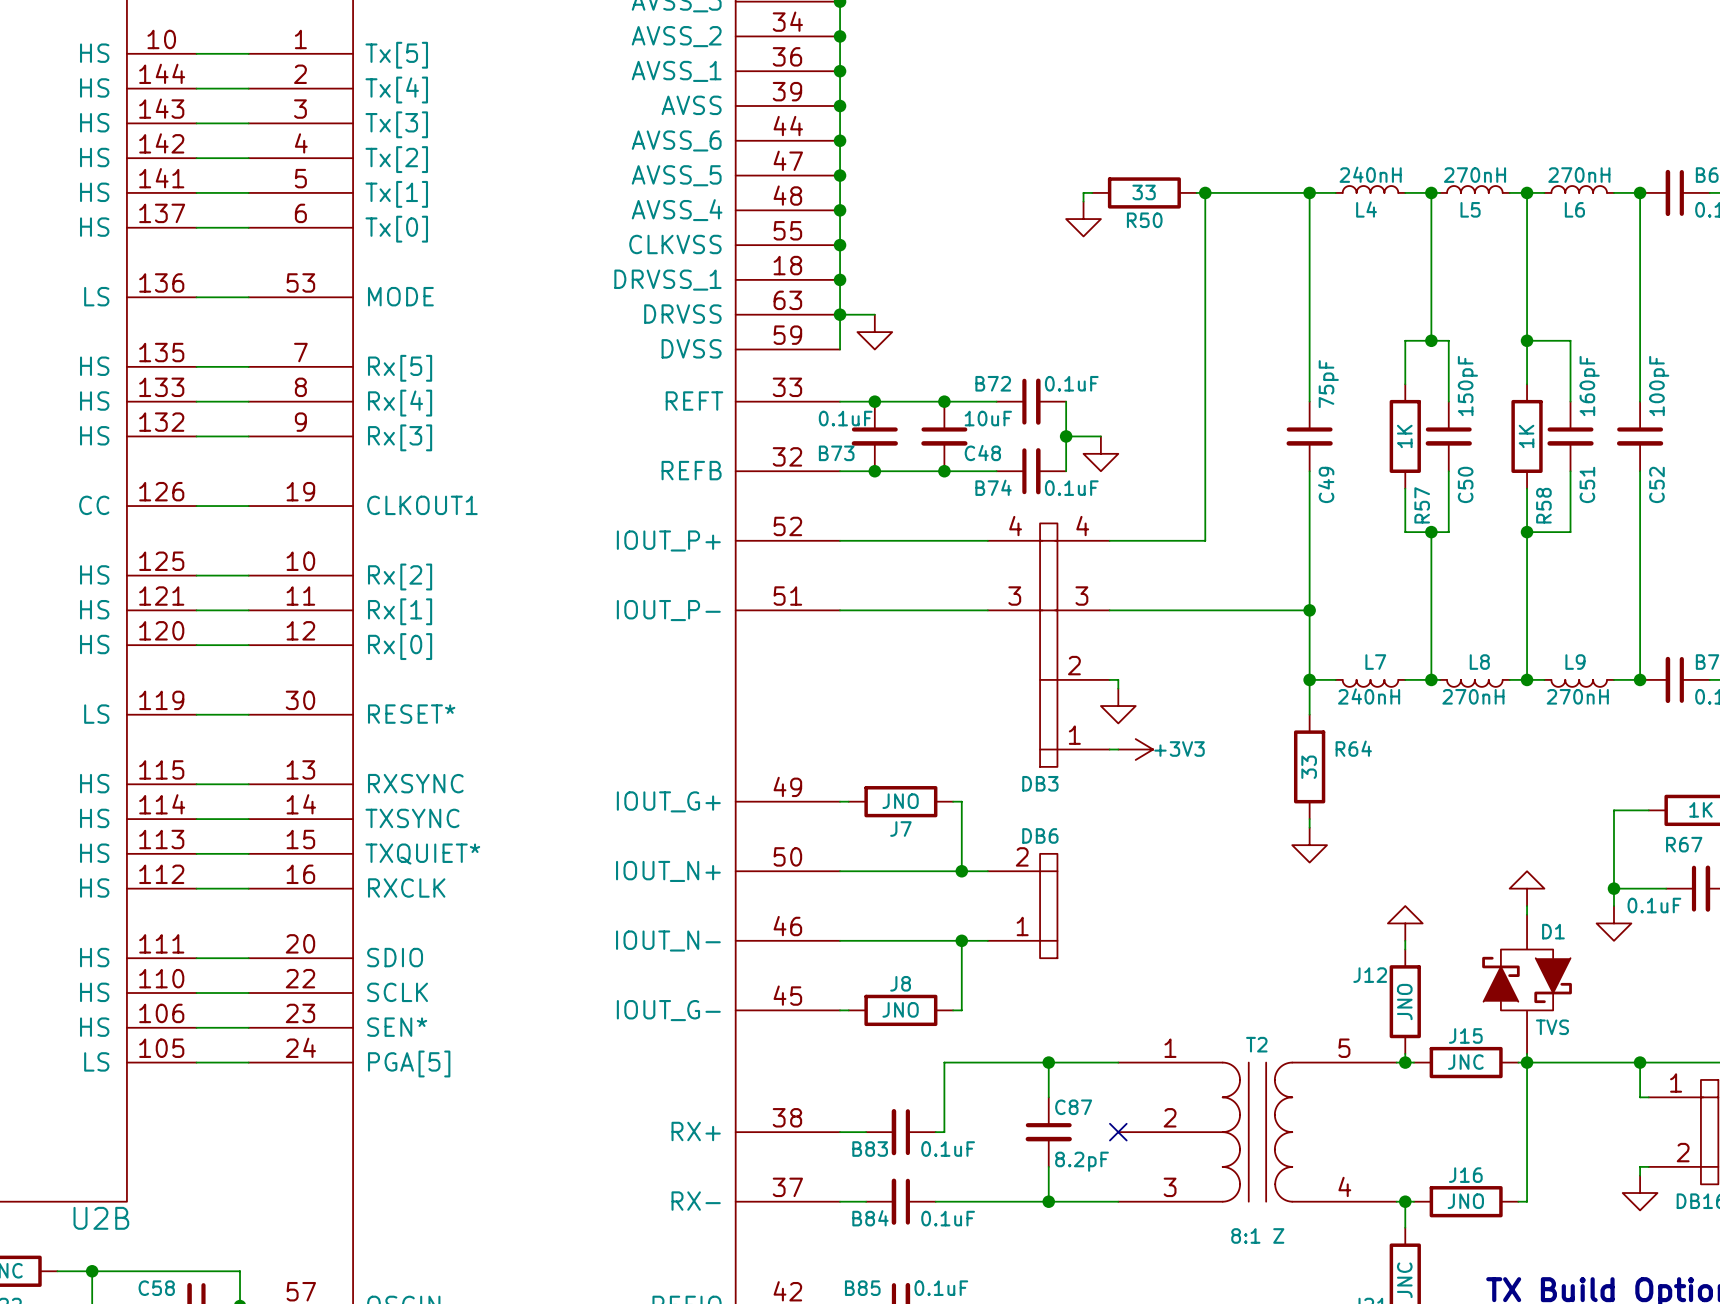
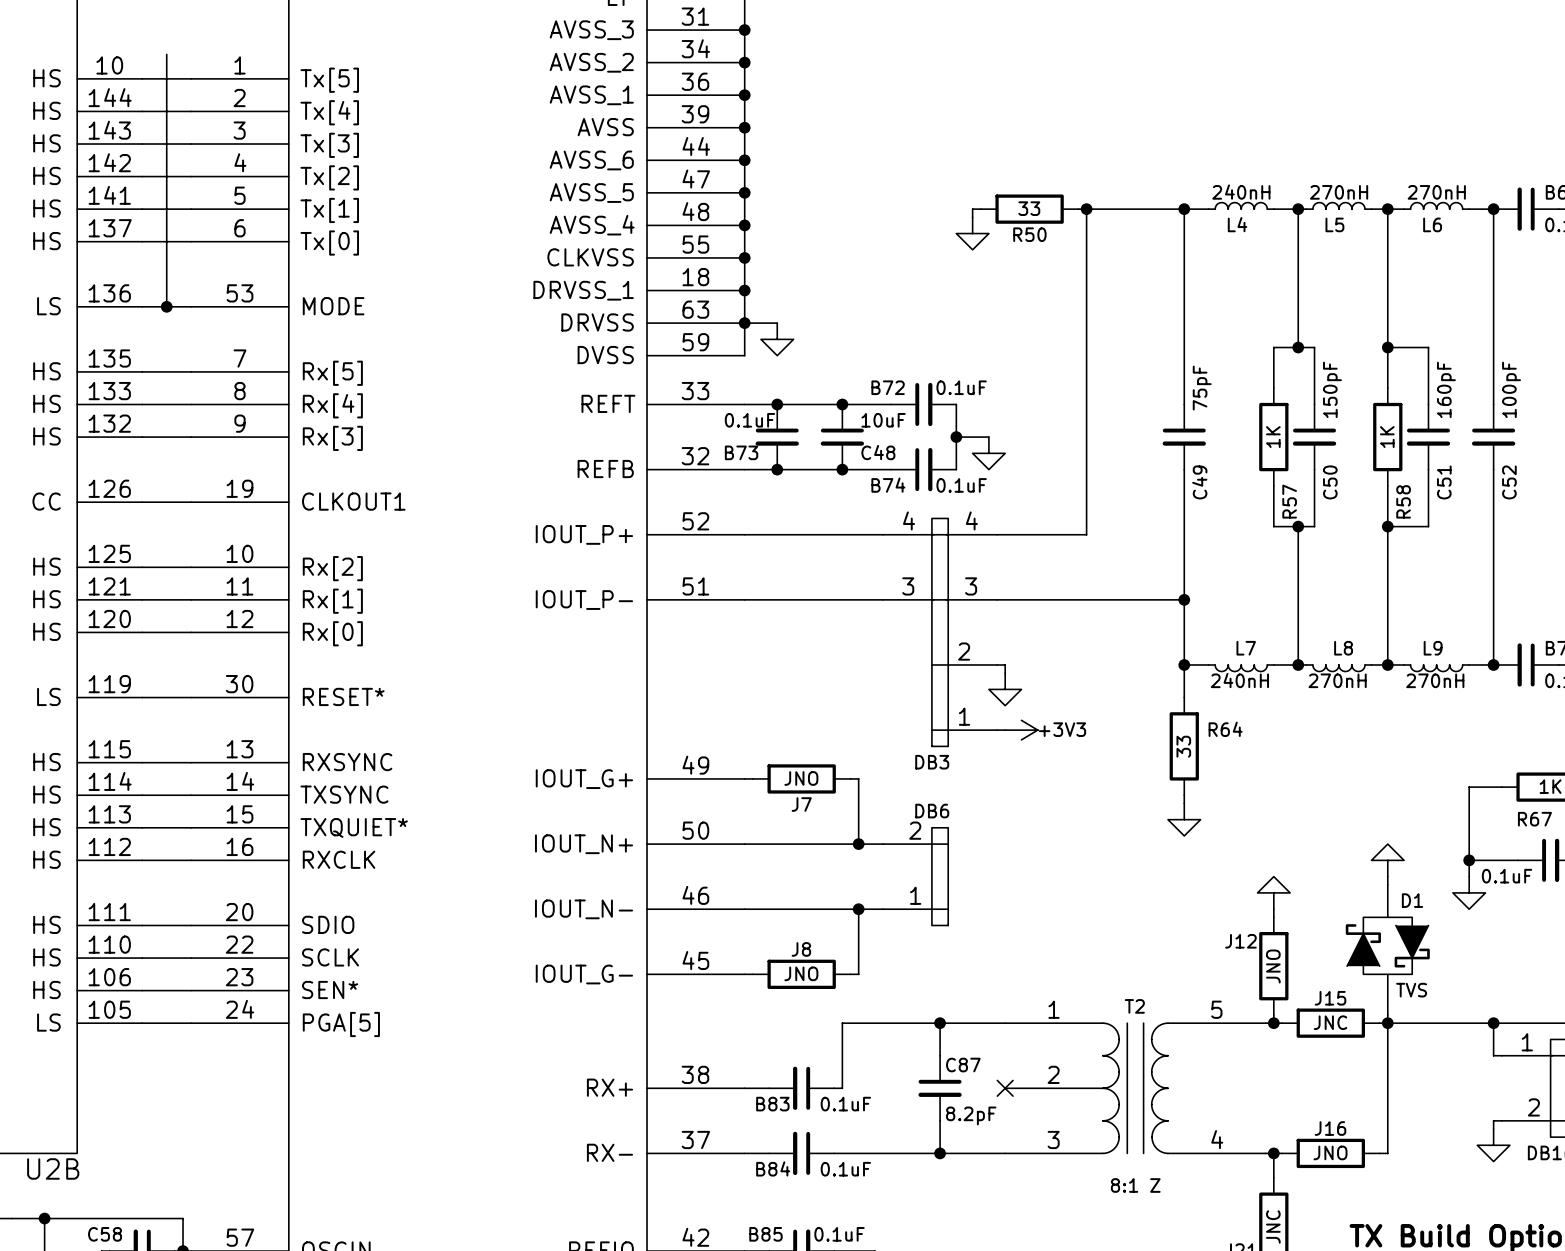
wire: none -> (166, 54) (166, 306)
junction: none -> (166, 306)

